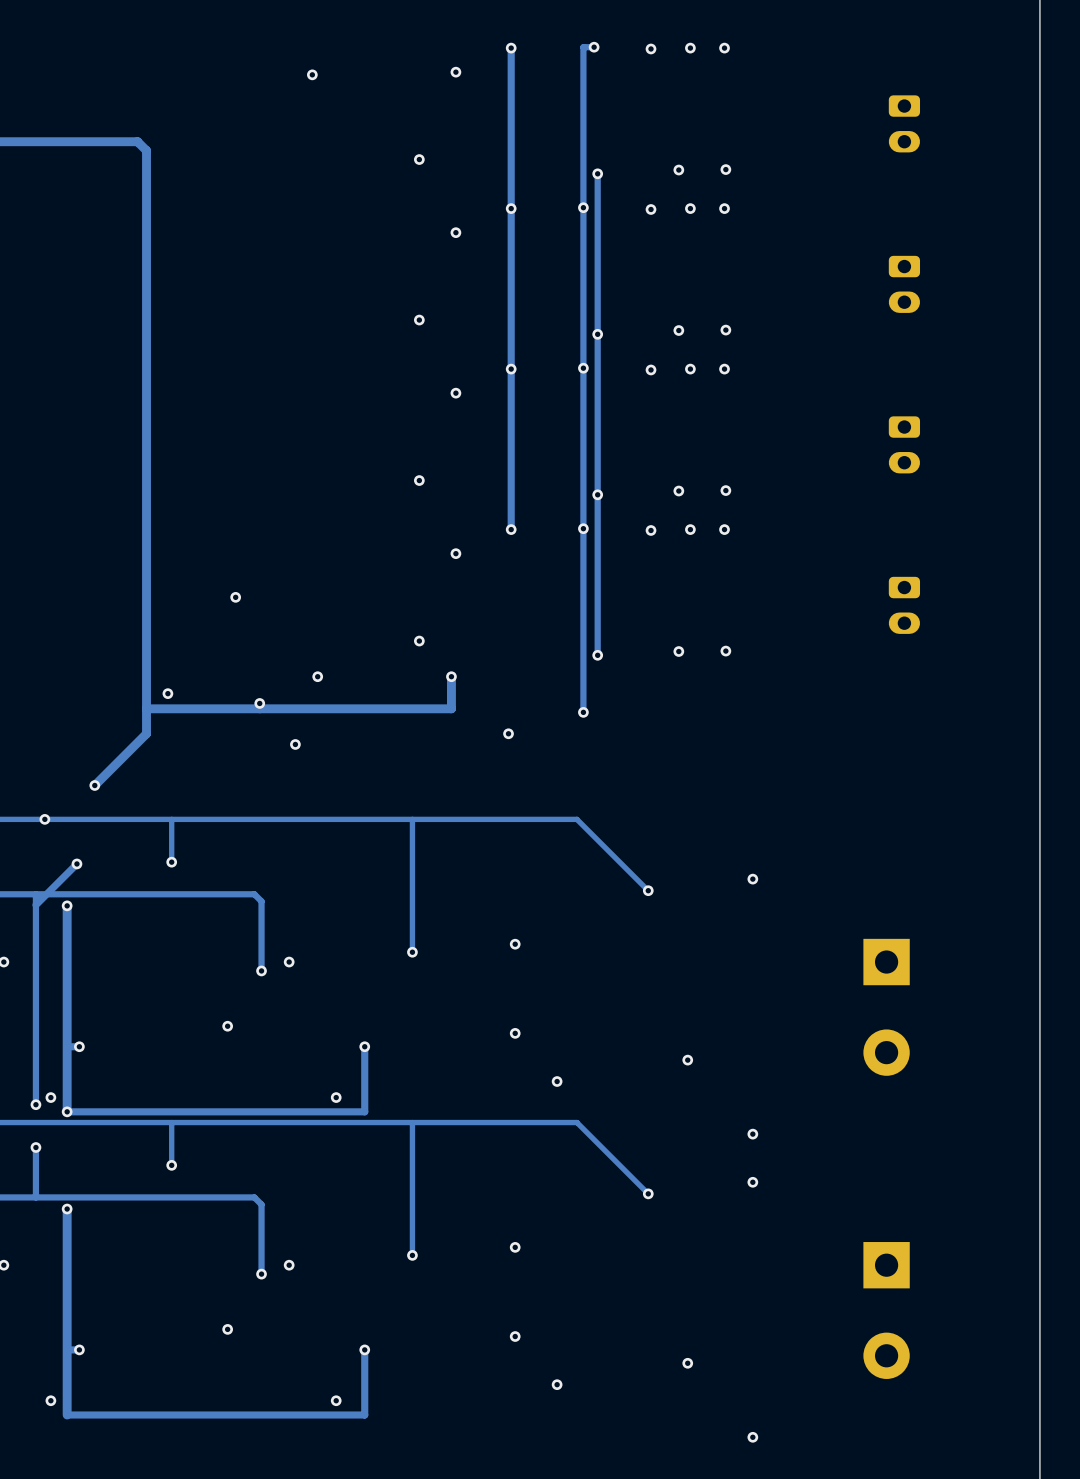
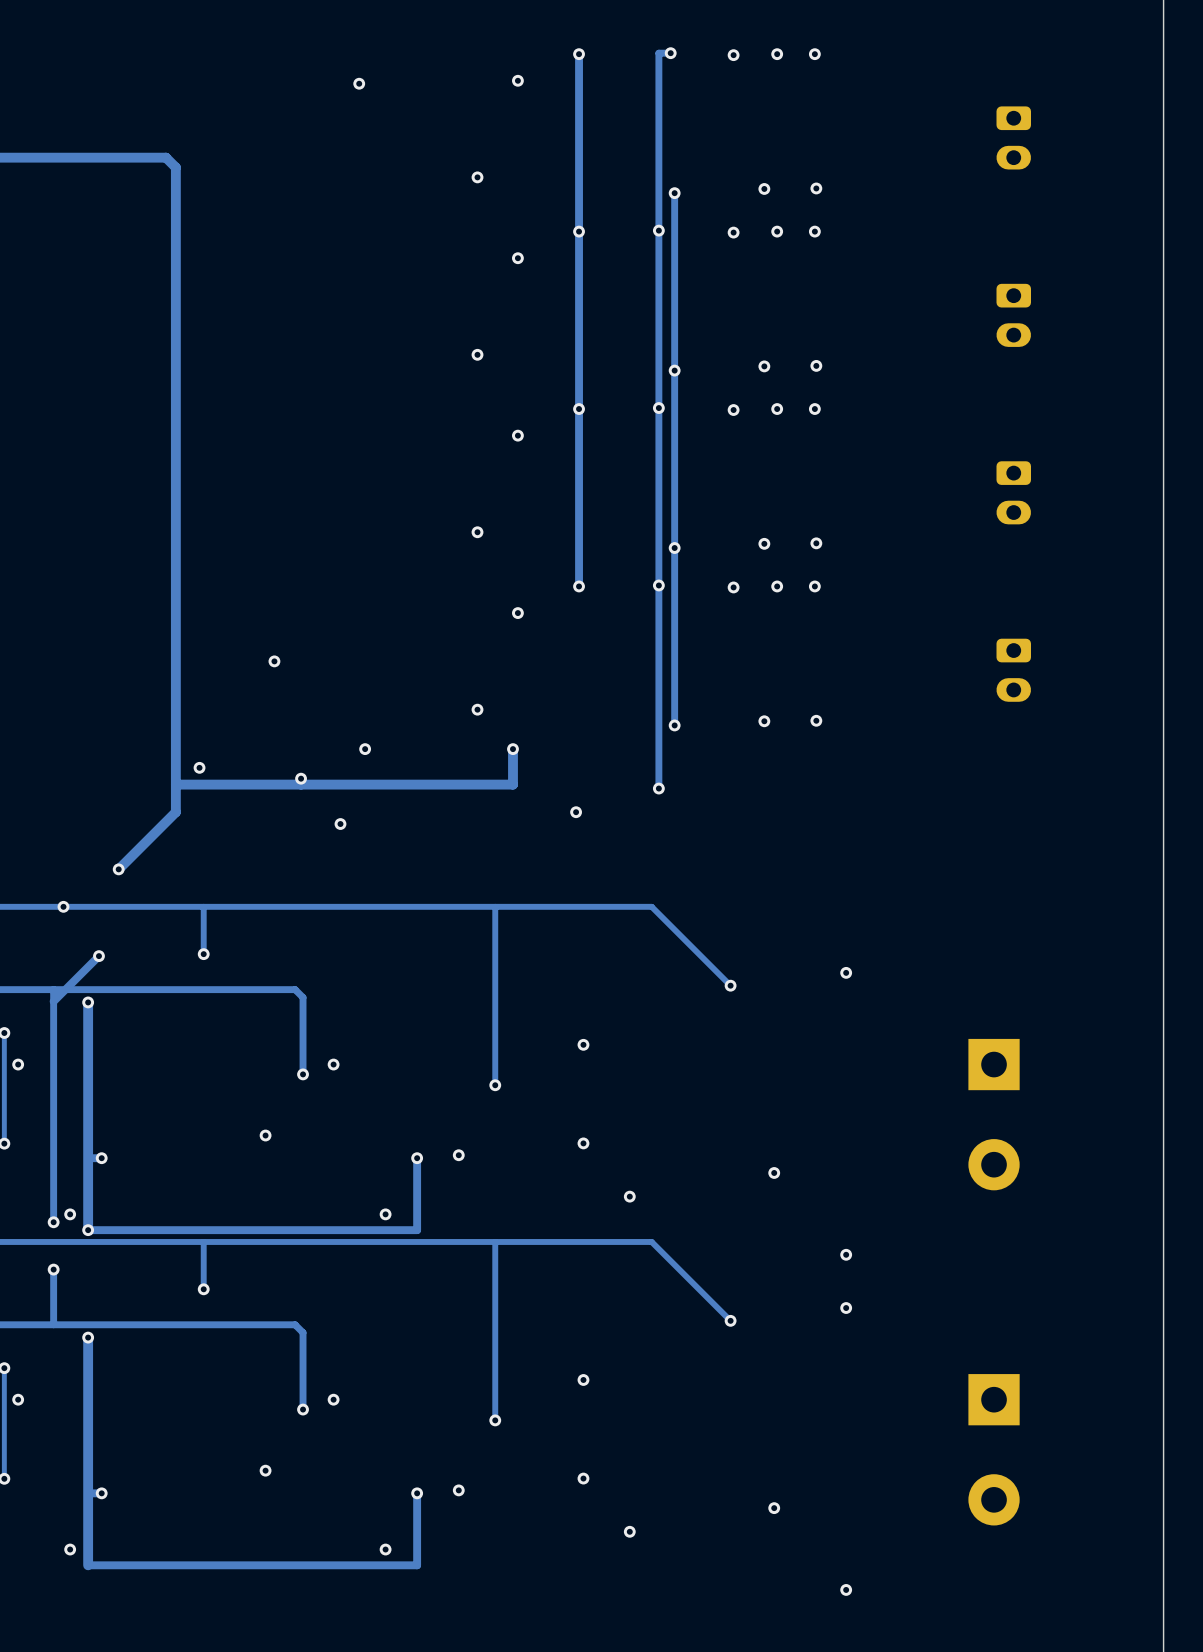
track: (412, 819) (412, 952) -> none
track: none -> (495, 906) (495, 1085)
via position: (412, 952) -> (495, 1085)
via: none -> (458, 1155)
track: (412, 1122) (412, 1255) -> none
track: none -> (495, 1241) (495, 1420)
via position: (412, 1255) -> (495, 1420)
via: none -> (458, 1490)

